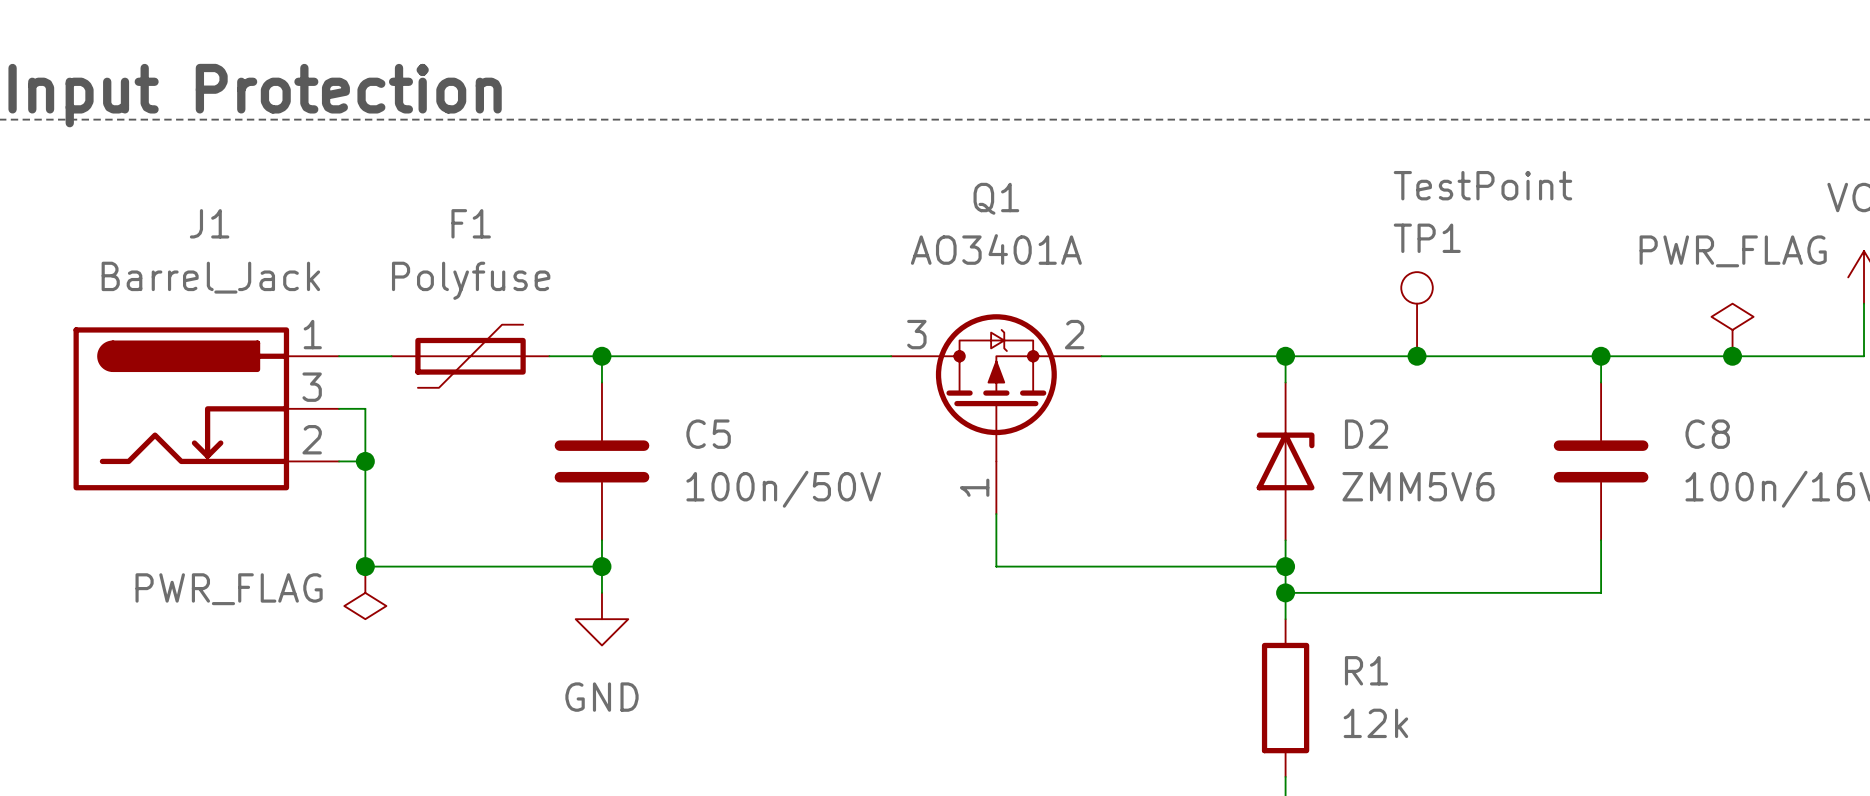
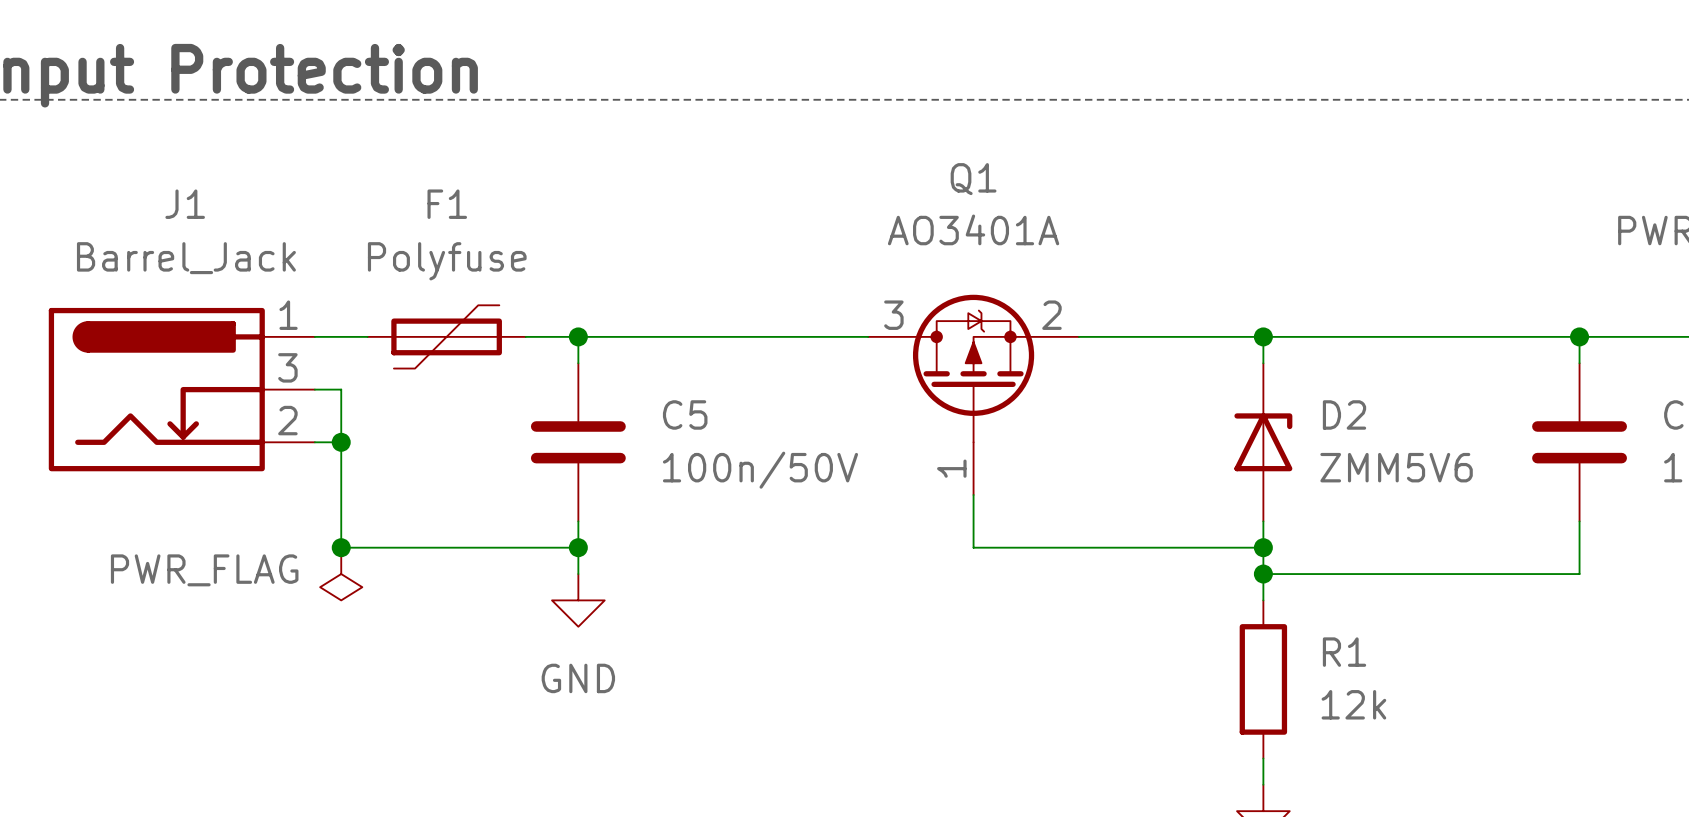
TP1: TestPoint (1417, 314) -> none
junction: (1417, 356) -> none

